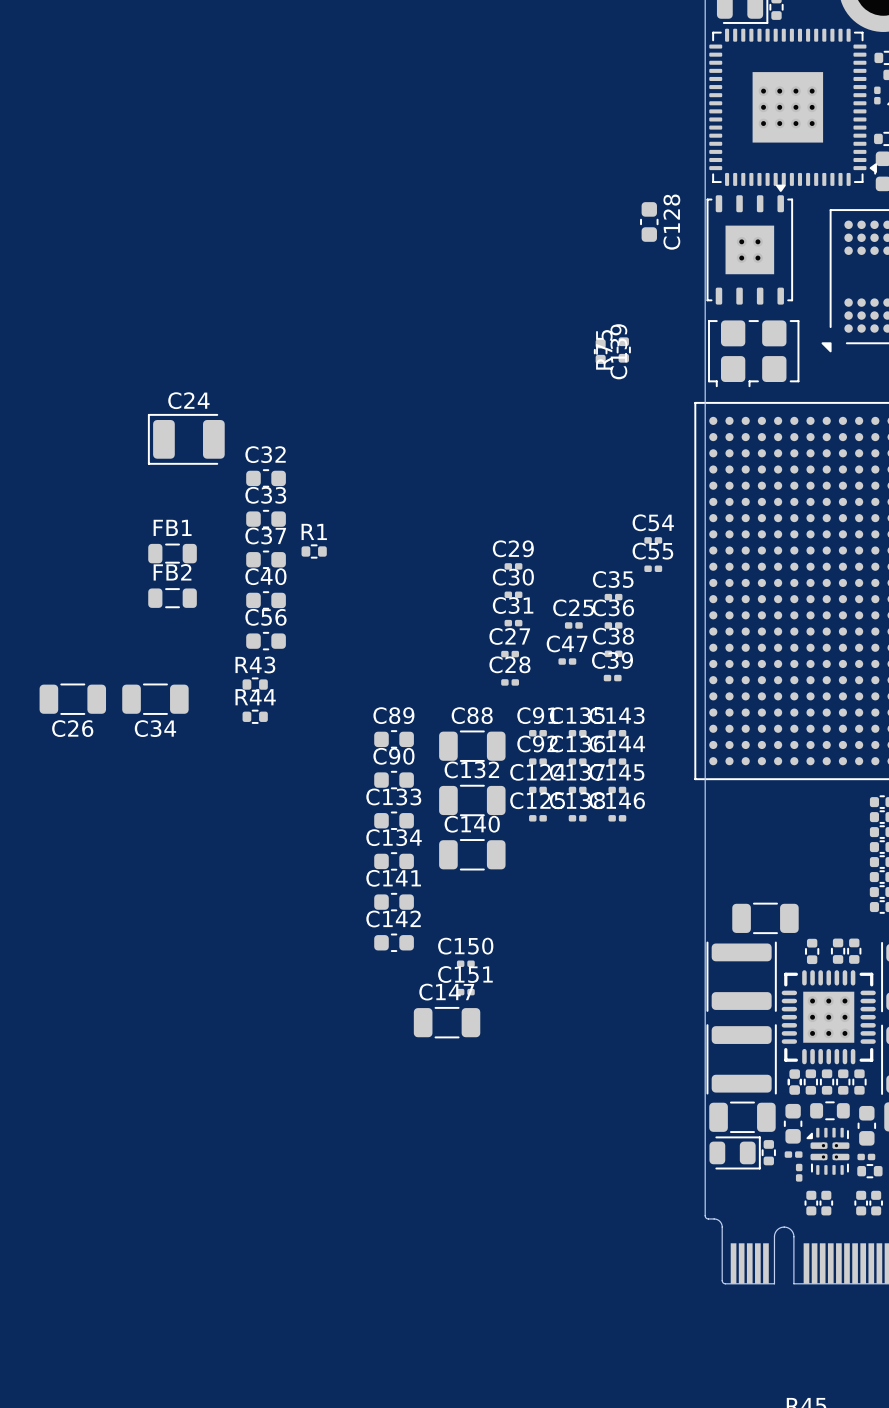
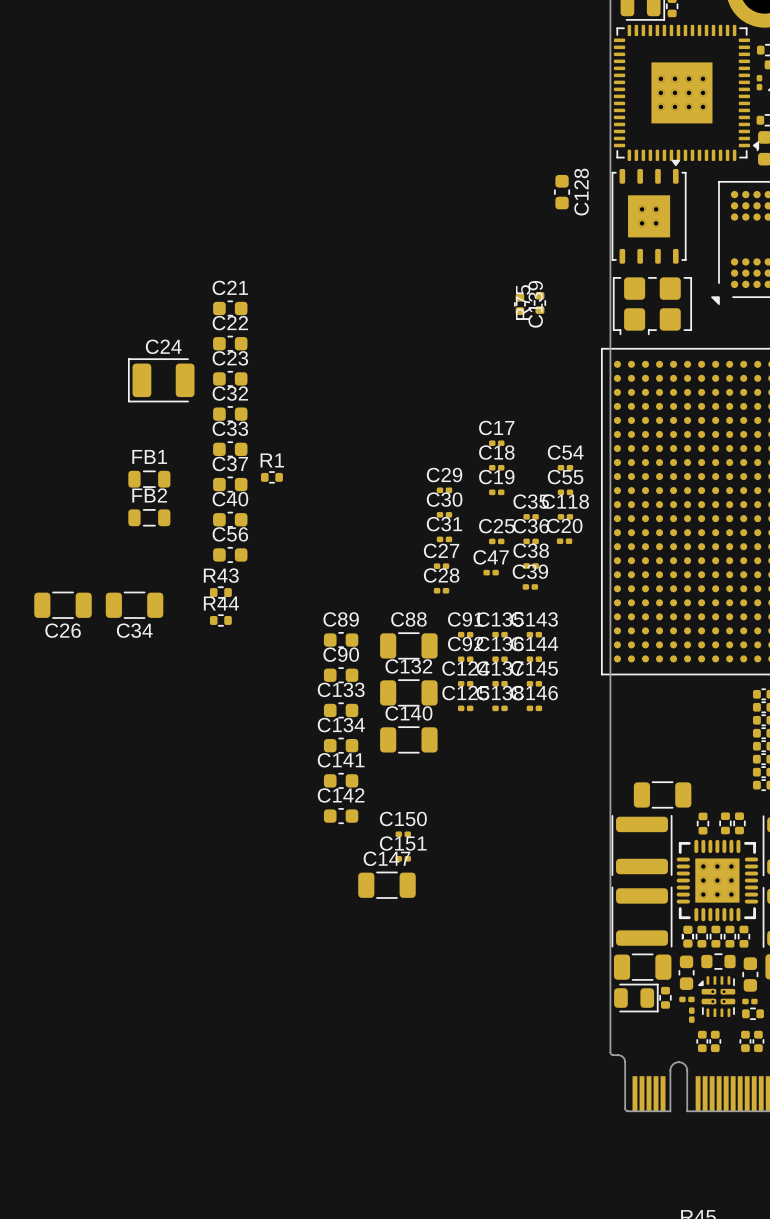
C21: none -> (230, 308)
C22: none -> (230, 343)
C23: none -> (230, 378)
C17: none -> (496, 443)
C18: none -> (496, 467)
C19: none -> (496, 492)
C118: none -> (565, 516)
C20: none -> (564, 541)

